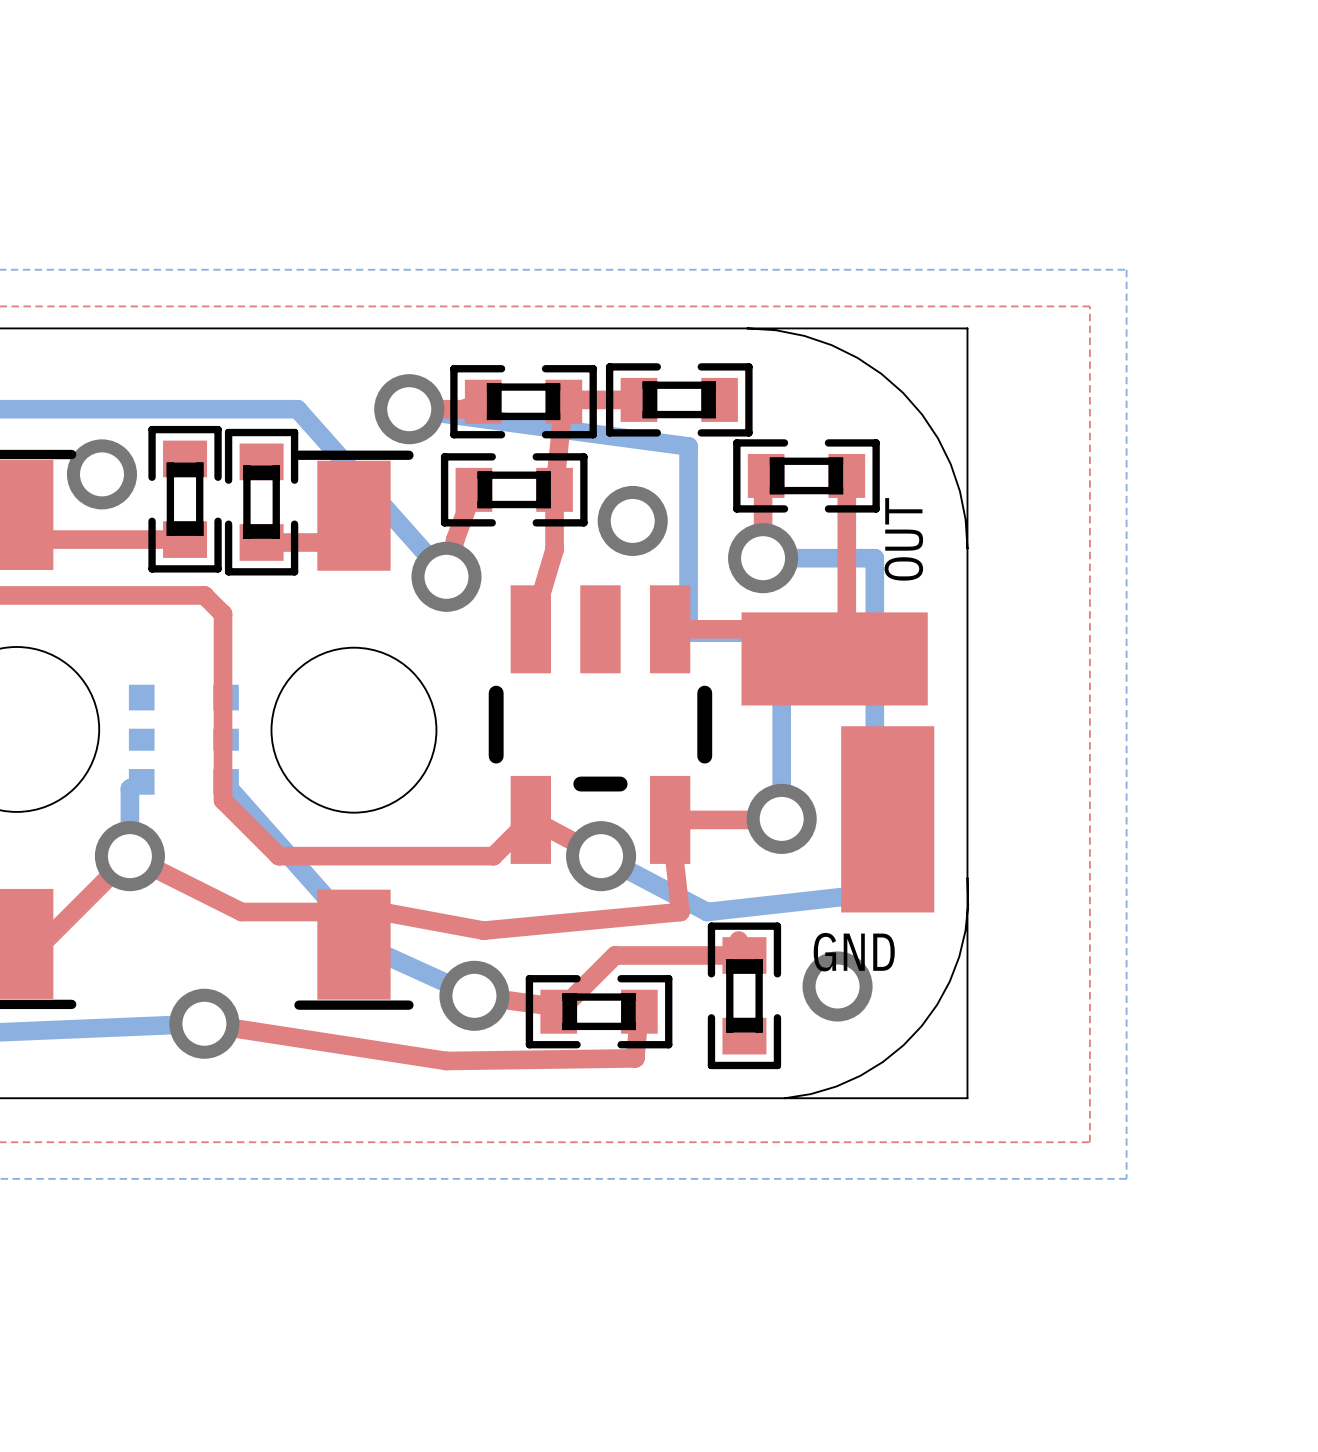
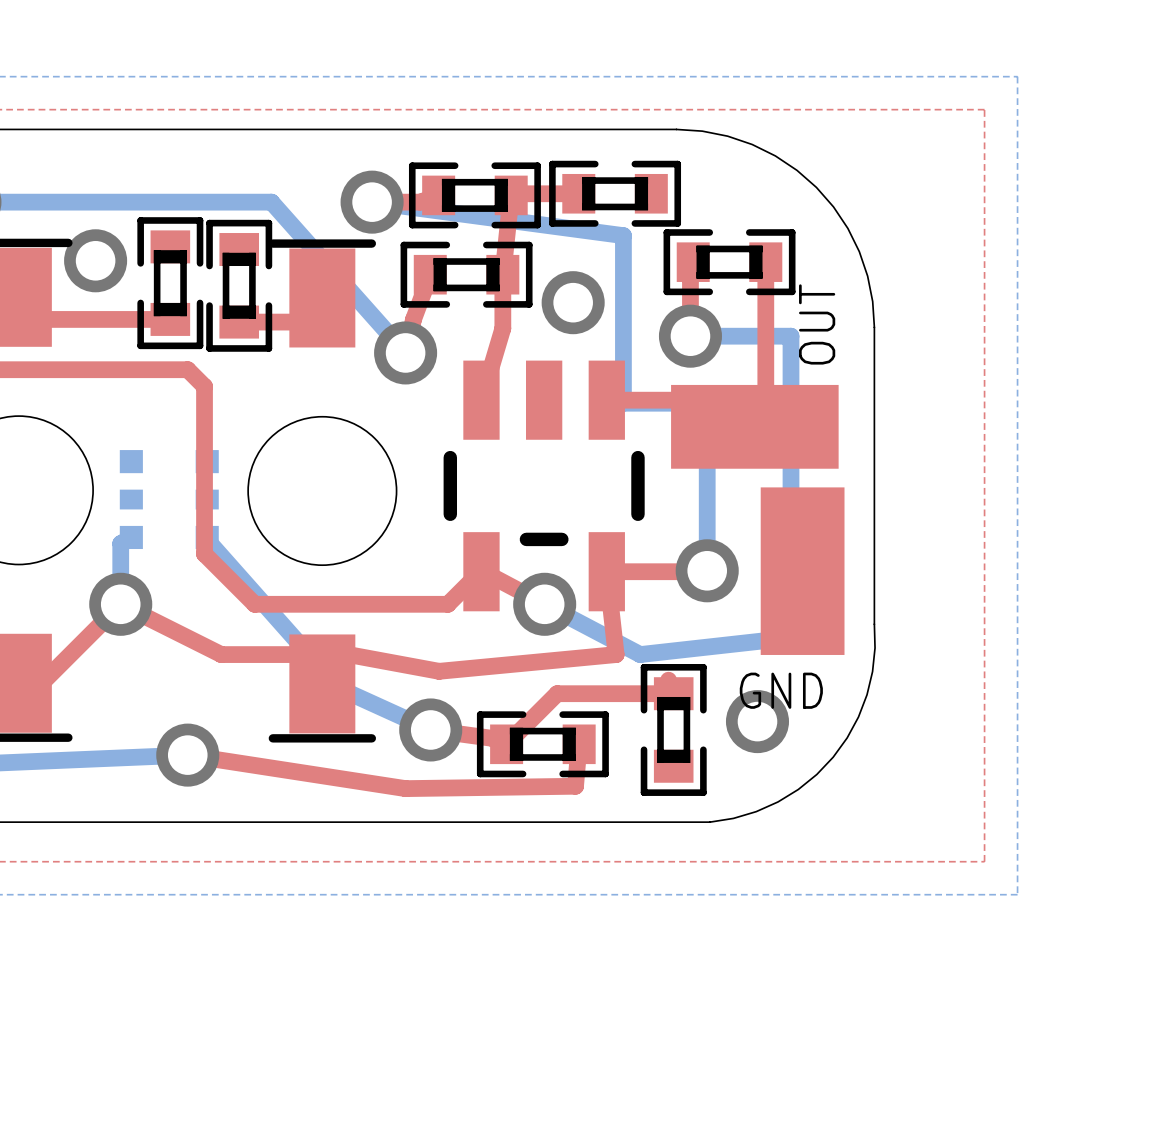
board edge: (747, 328) (967, 328) (967, 548) -> none
board edge: (967, 878) (967, 1098) (784, 1098) -> none

